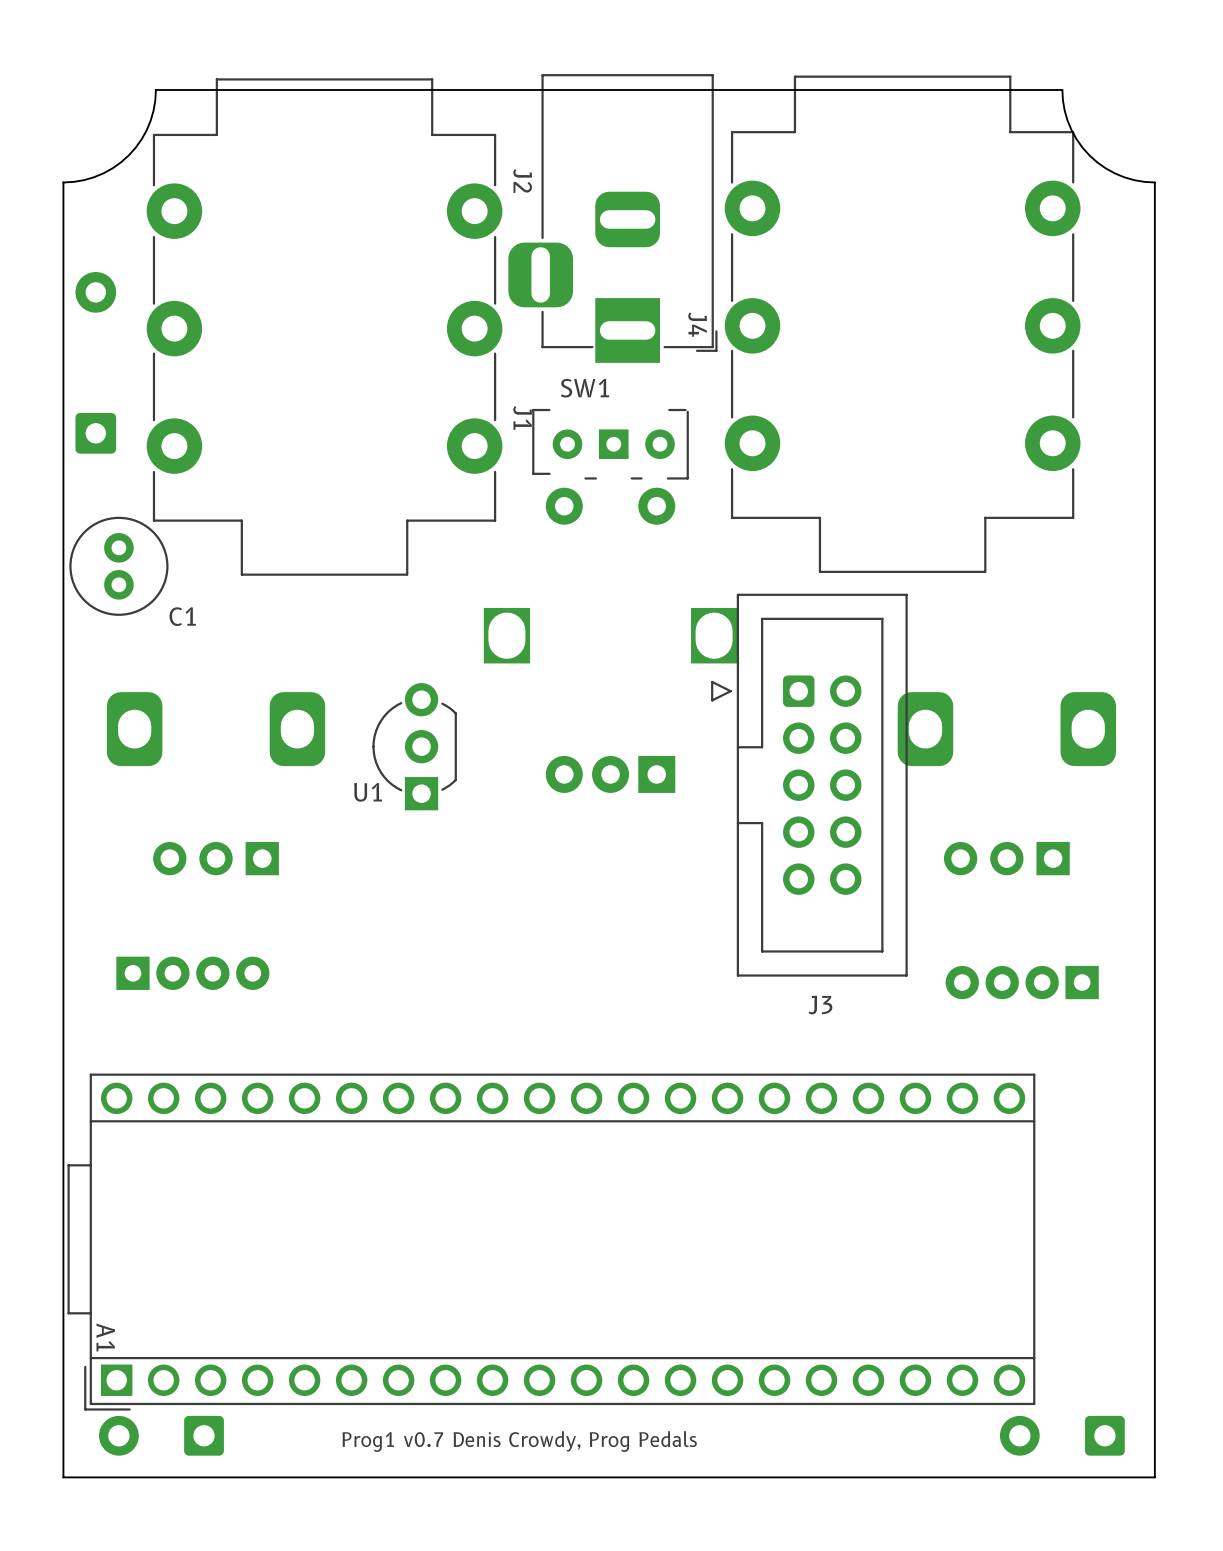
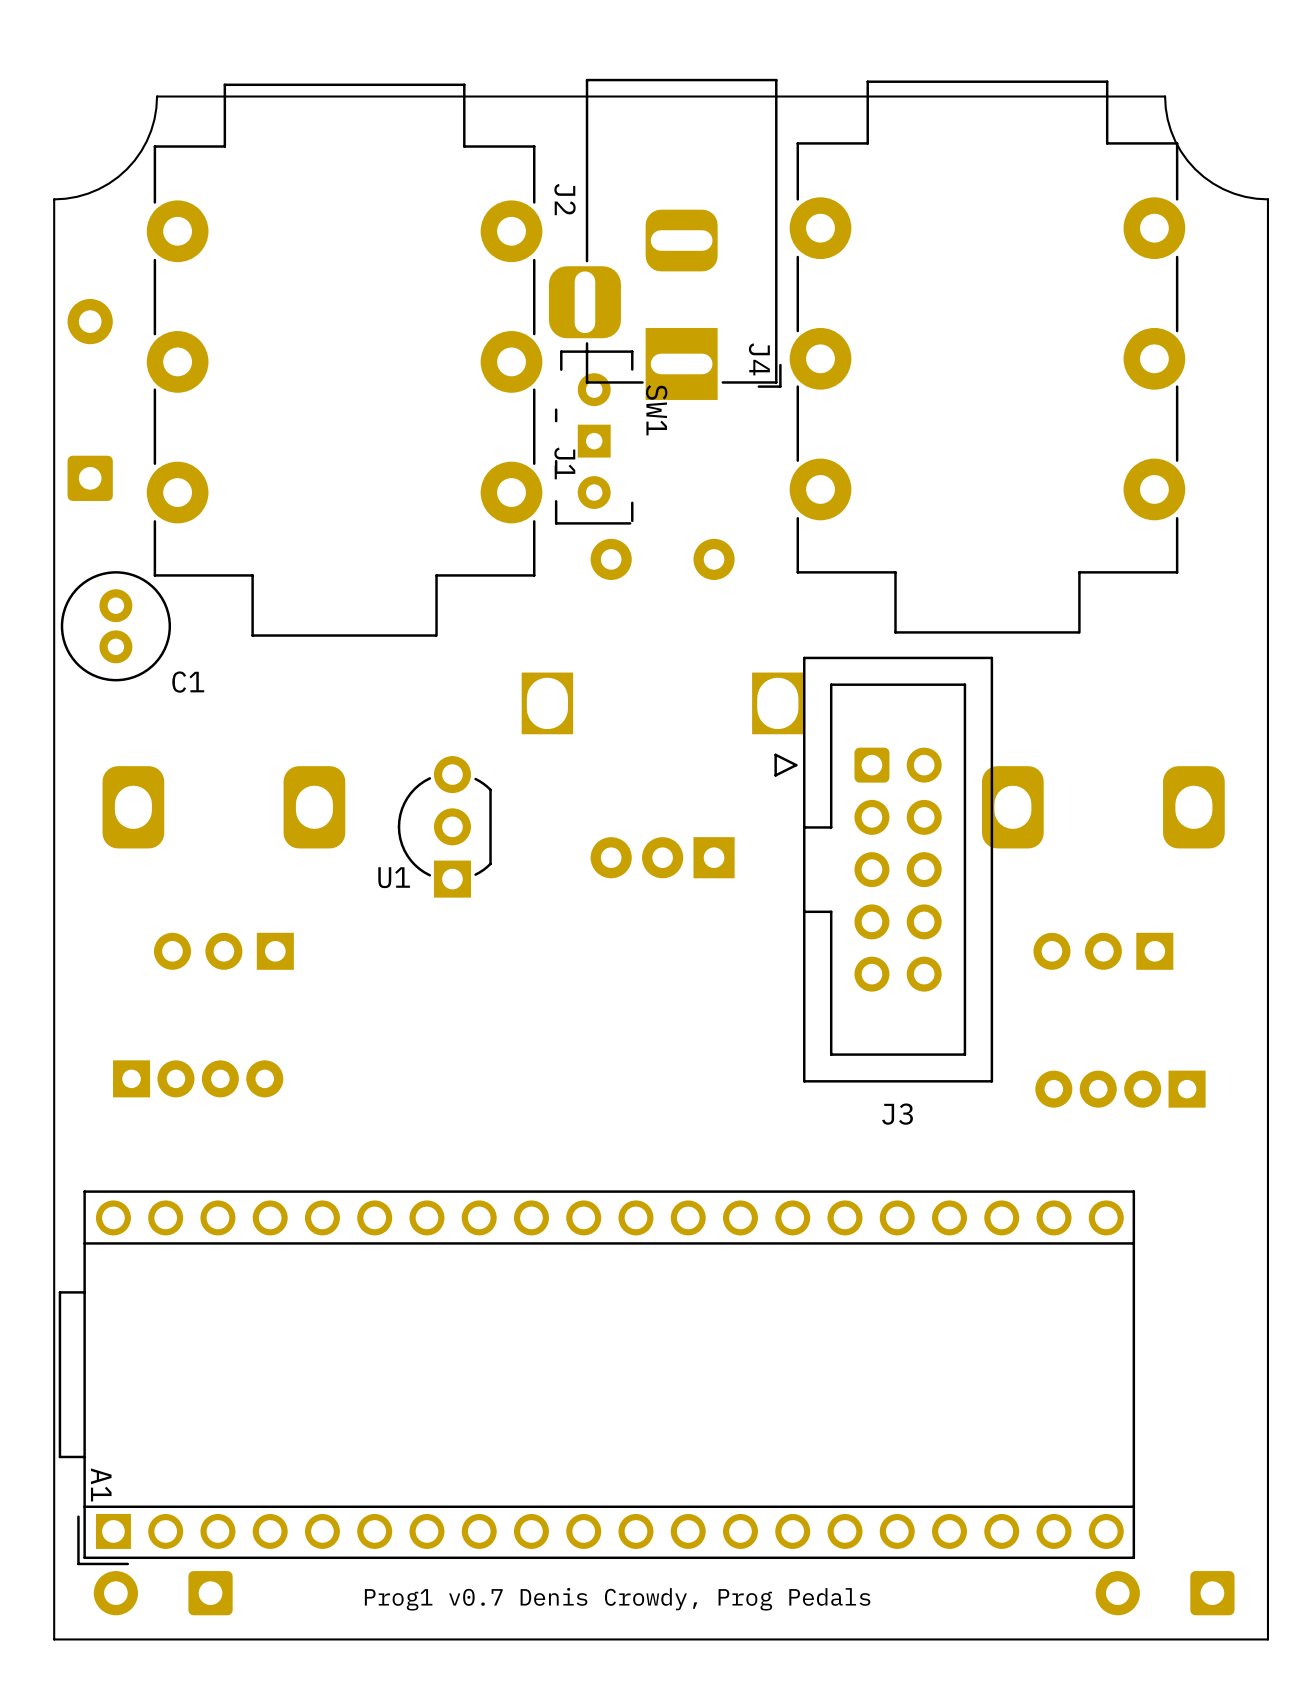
SW1 rotation: 0° (610, 444) -> 90° clockwise (594, 437)

